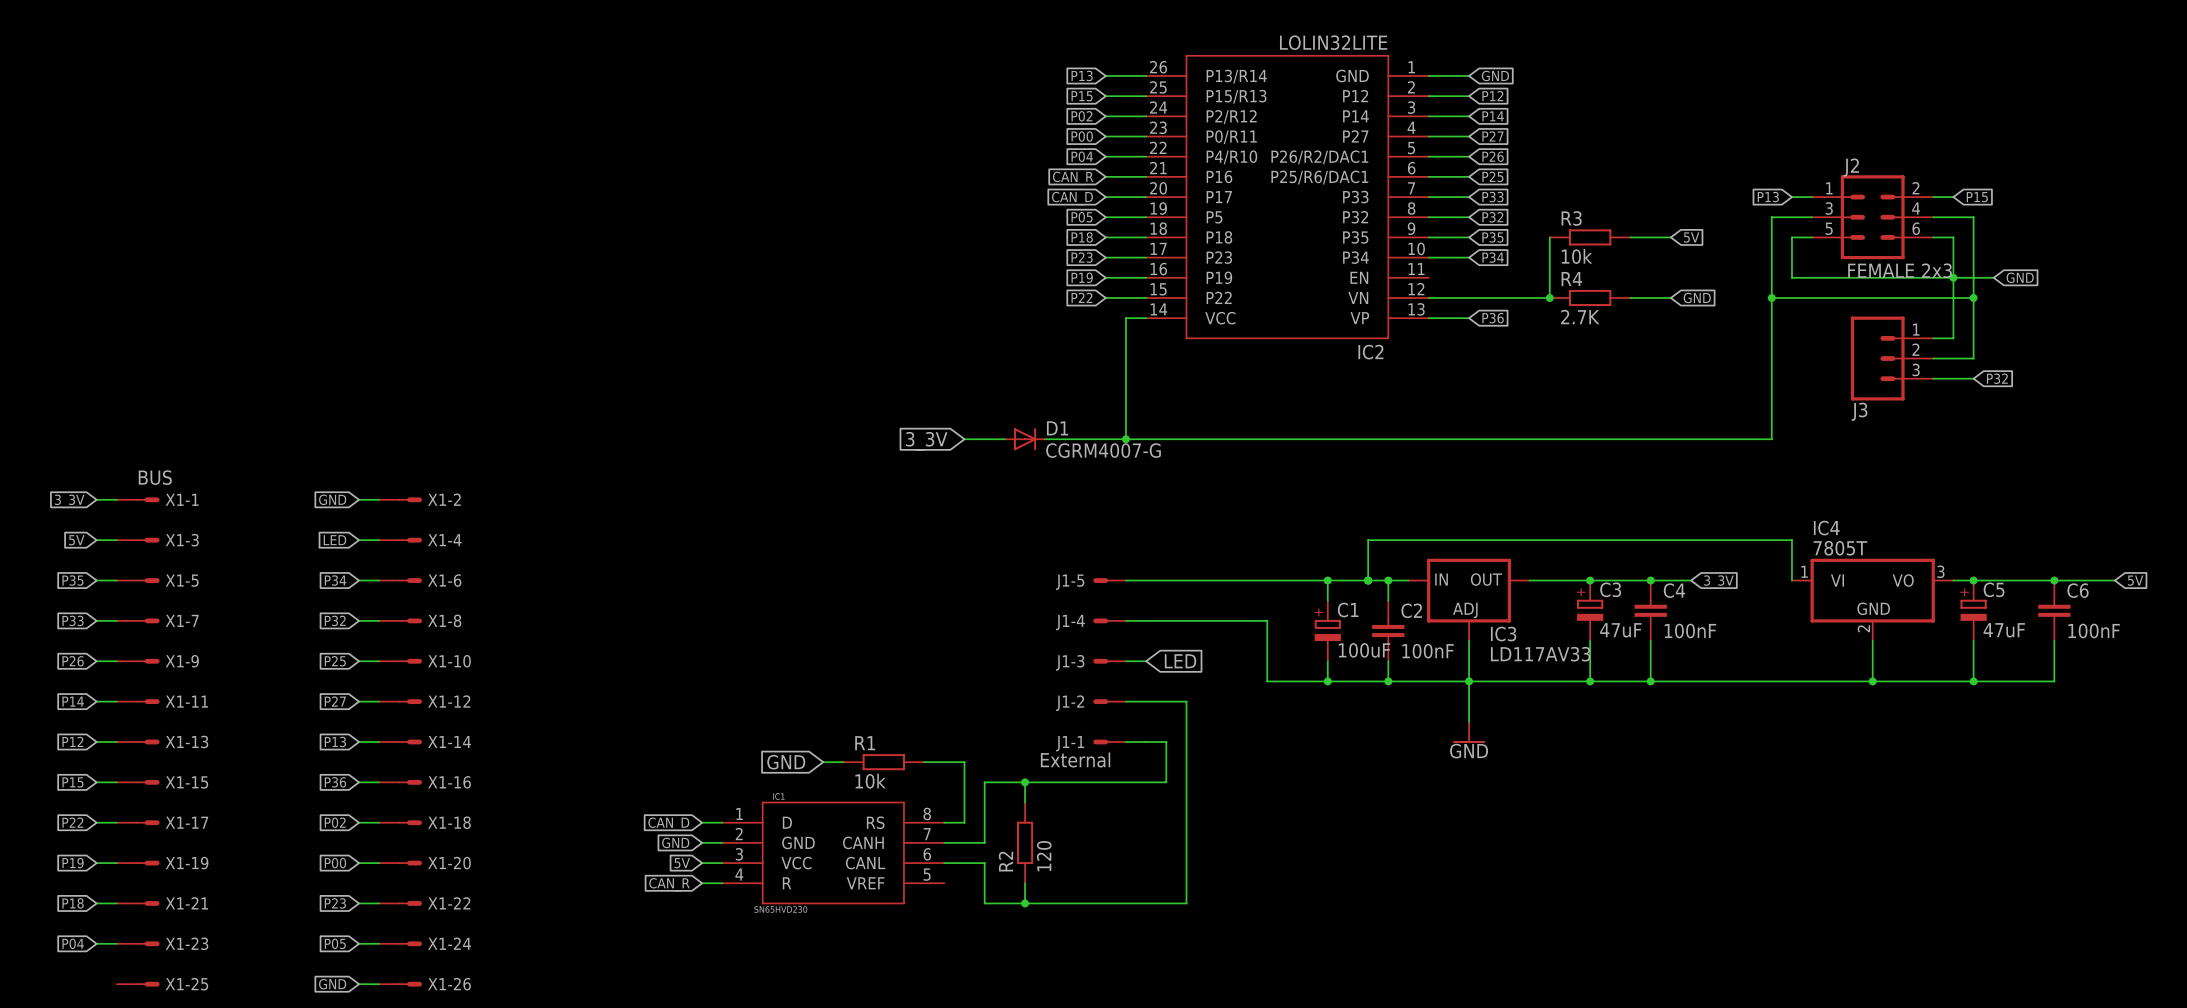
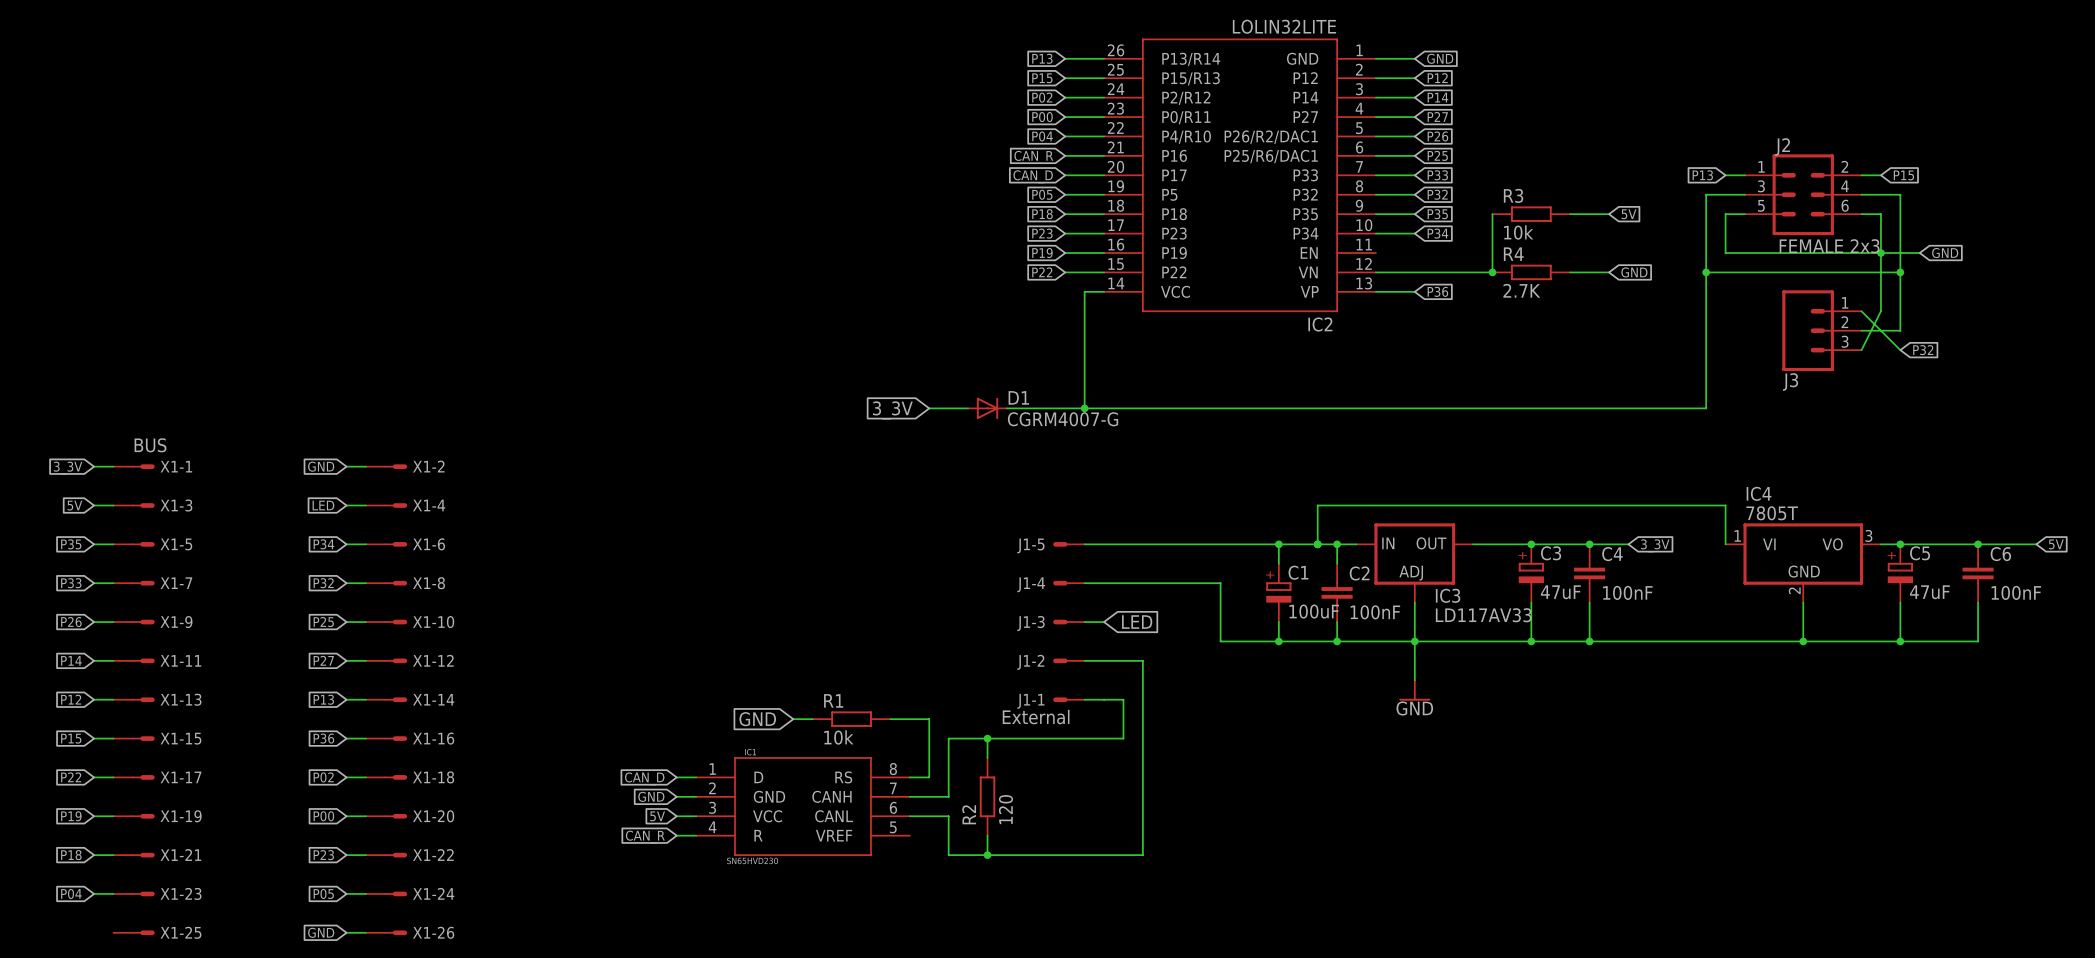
wire: (1933, 338) (1953, 338) -> (1861, 350) (1880, 311)
wire: (1933, 378) (1973, 378) -> (1861, 311) (1900, 350)

